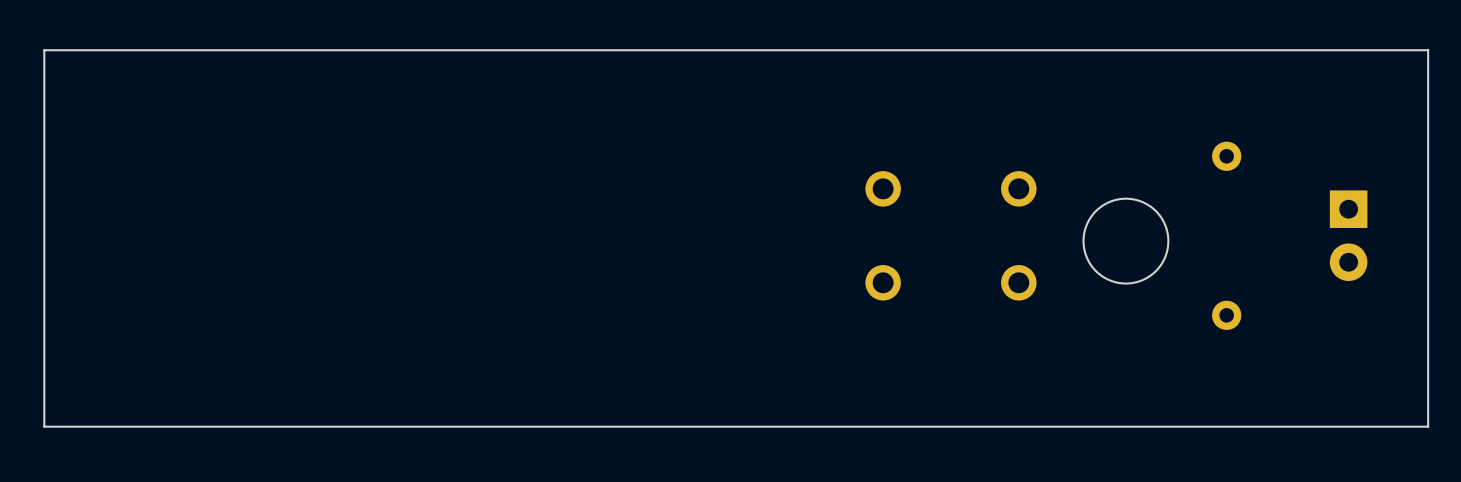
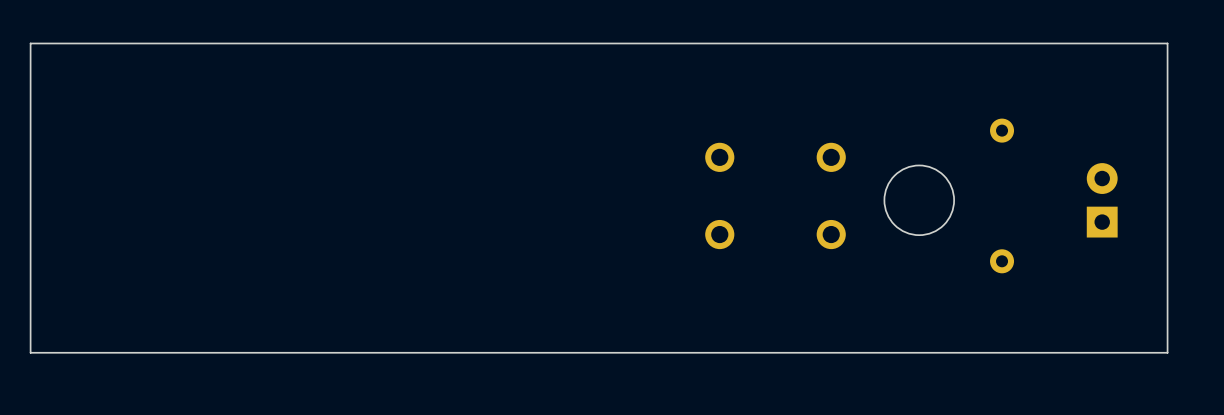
part rotation: 0° (1348, 235) -> 180° (1102, 200)

